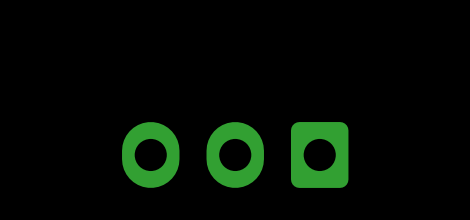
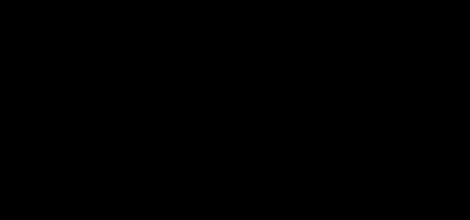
part: (235, 154) -> none

